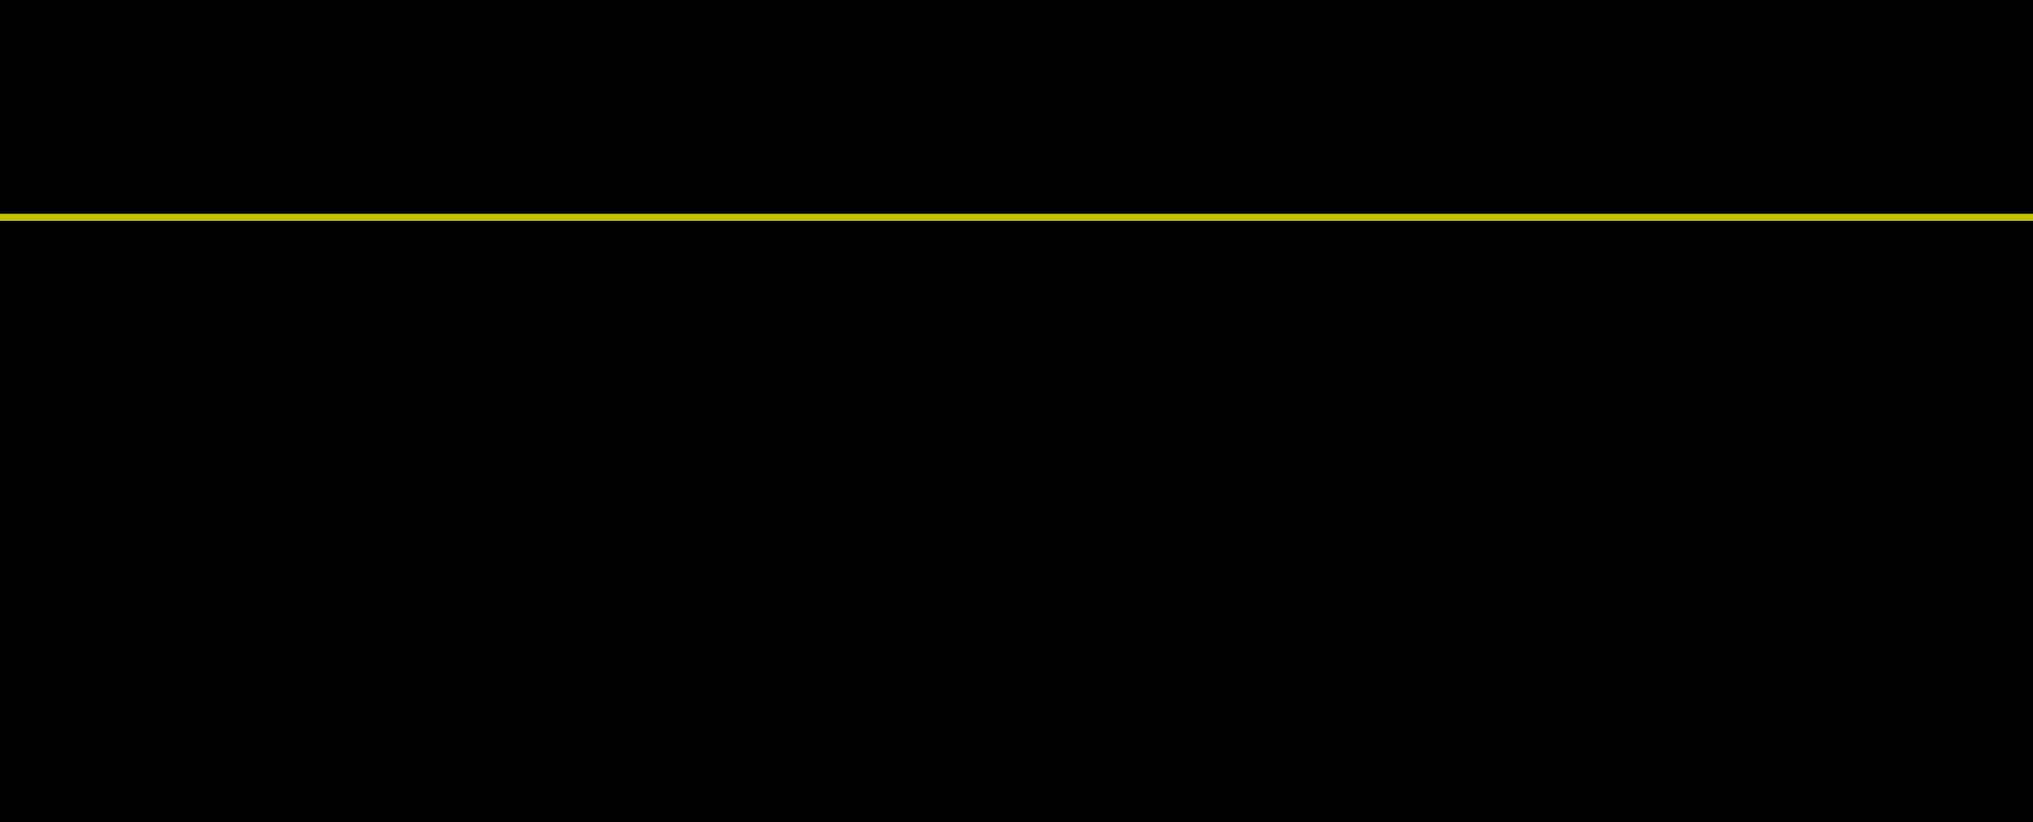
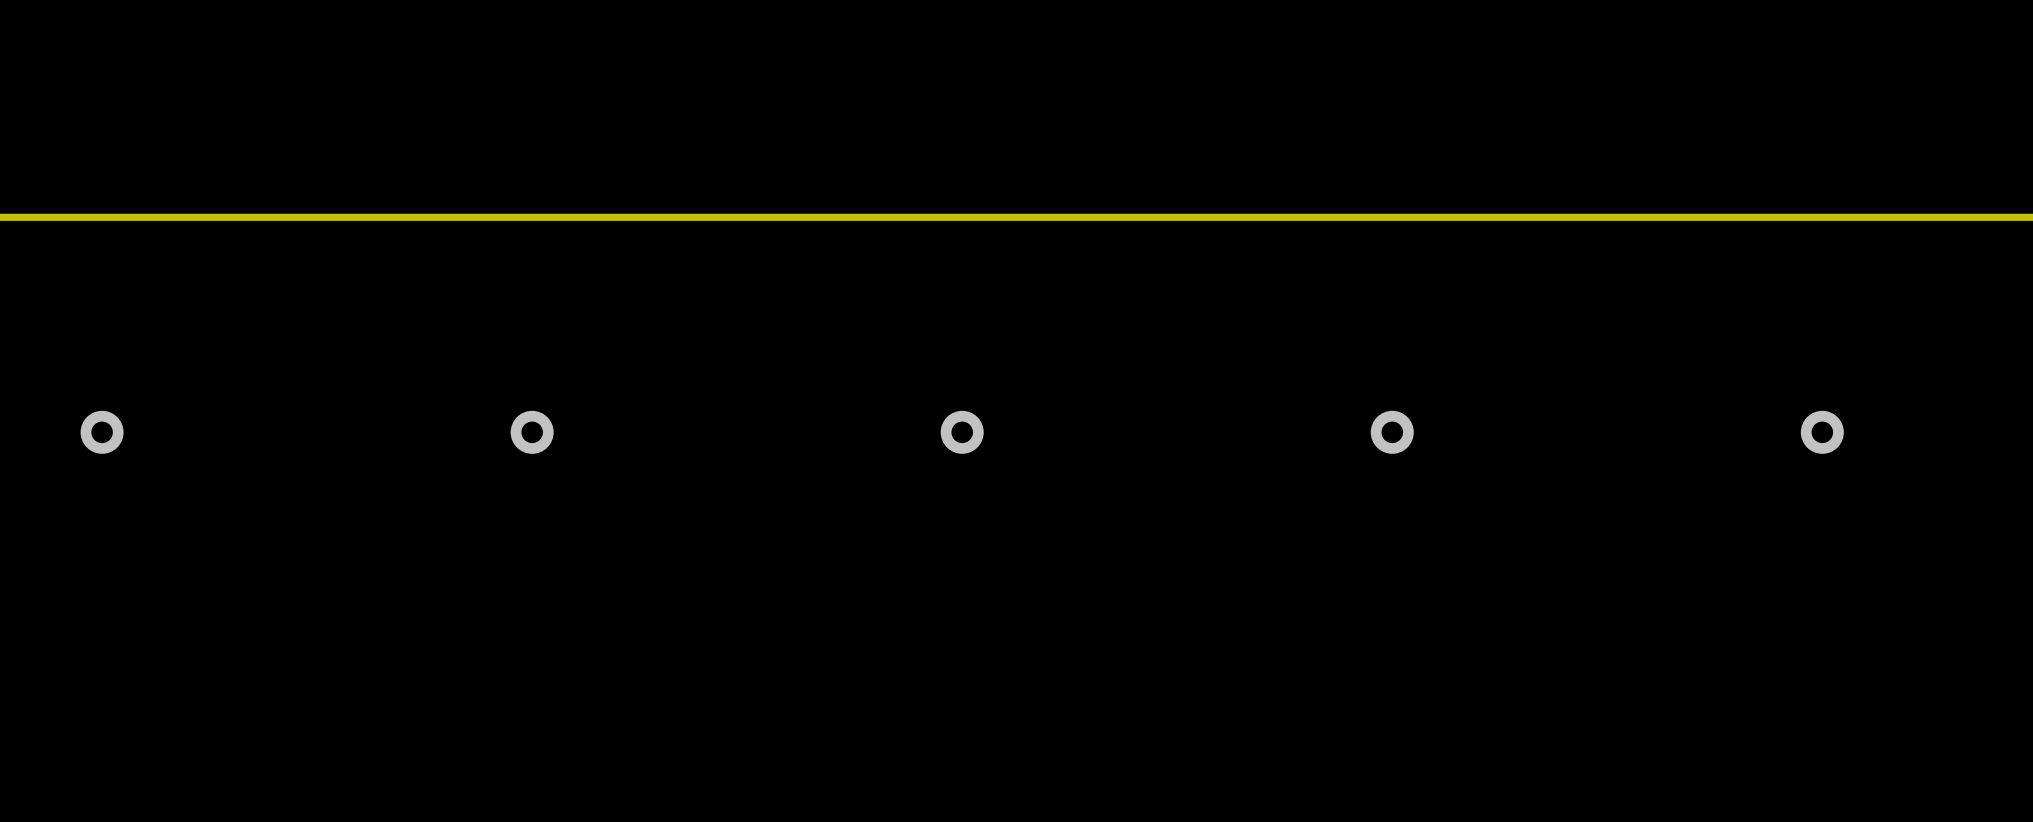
via: none -> (102, 432)
via: none -> (532, 432)
via: none -> (962, 432)
via: none -> (1392, 432)
via: none -> (1822, 432)

